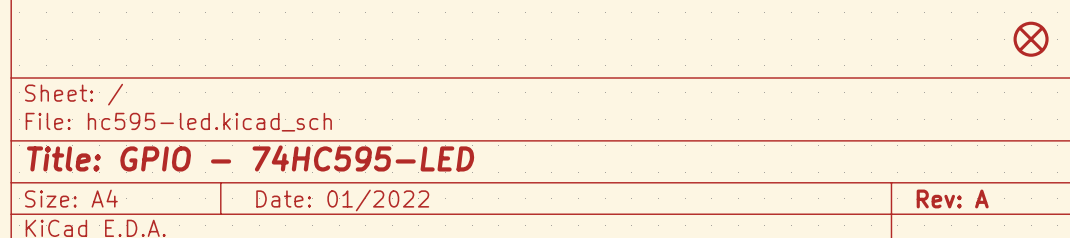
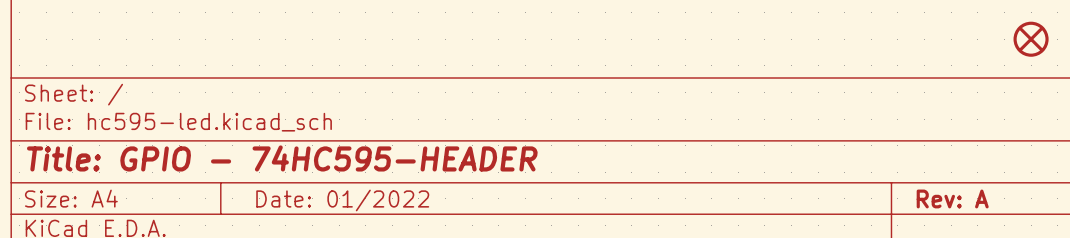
title block: Title: GPIO - 74HC595-LED (250, 158) -> Title: GPIO - 74HC595-HEADER (282, 158)

